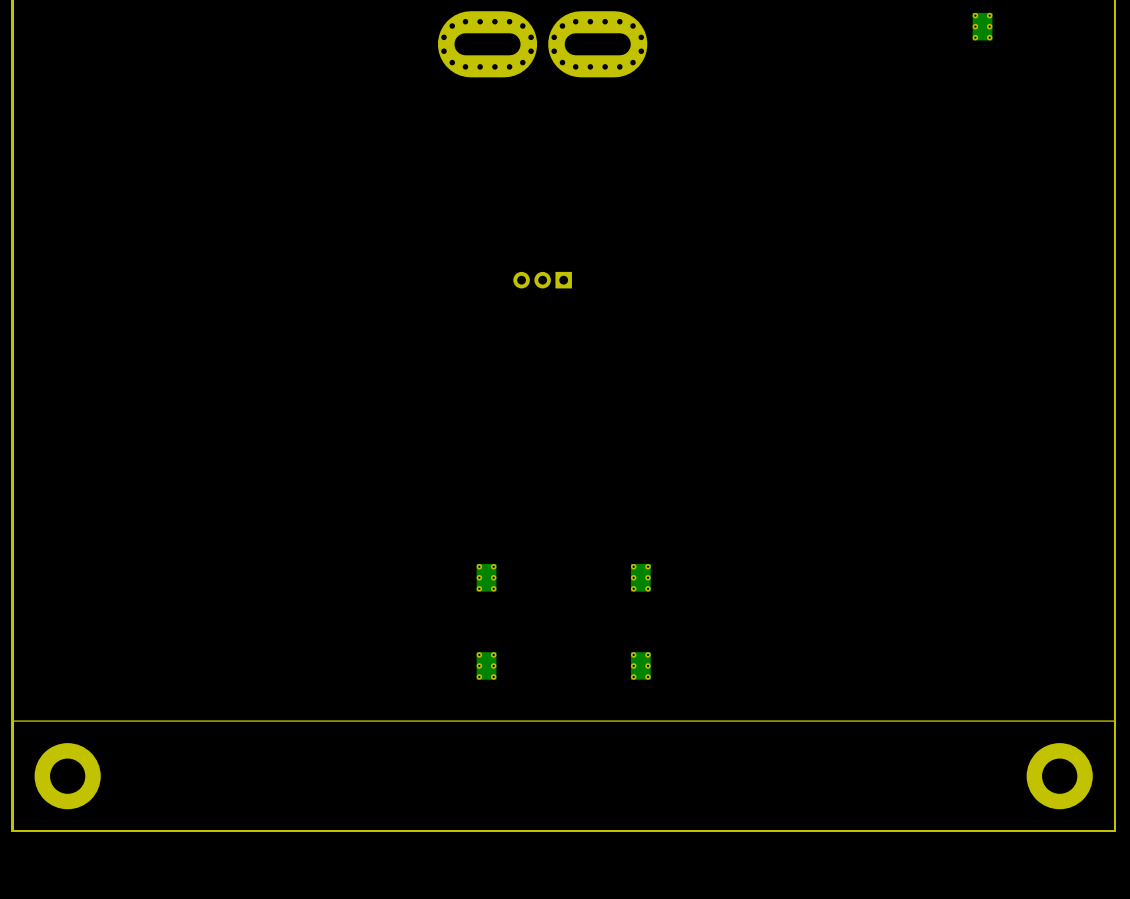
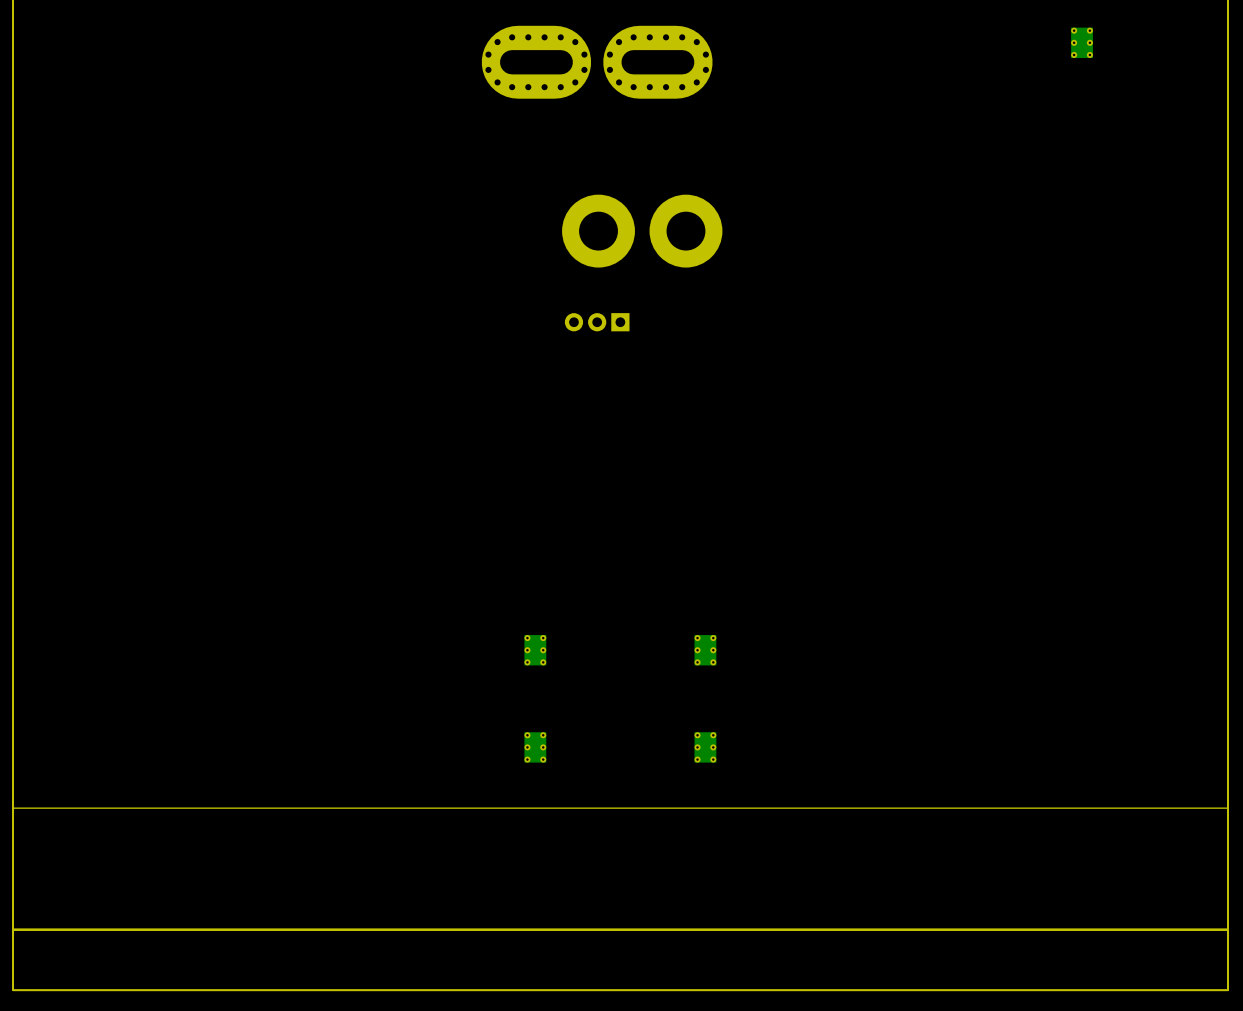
part: none -> (598, 231)
part: none -> (685, 231)
part: (67, 776) -> none
part: (1059, 776) -> none
board edge: none -> (1227, 929) (1227, 990) (12, 990) (12, 929)

